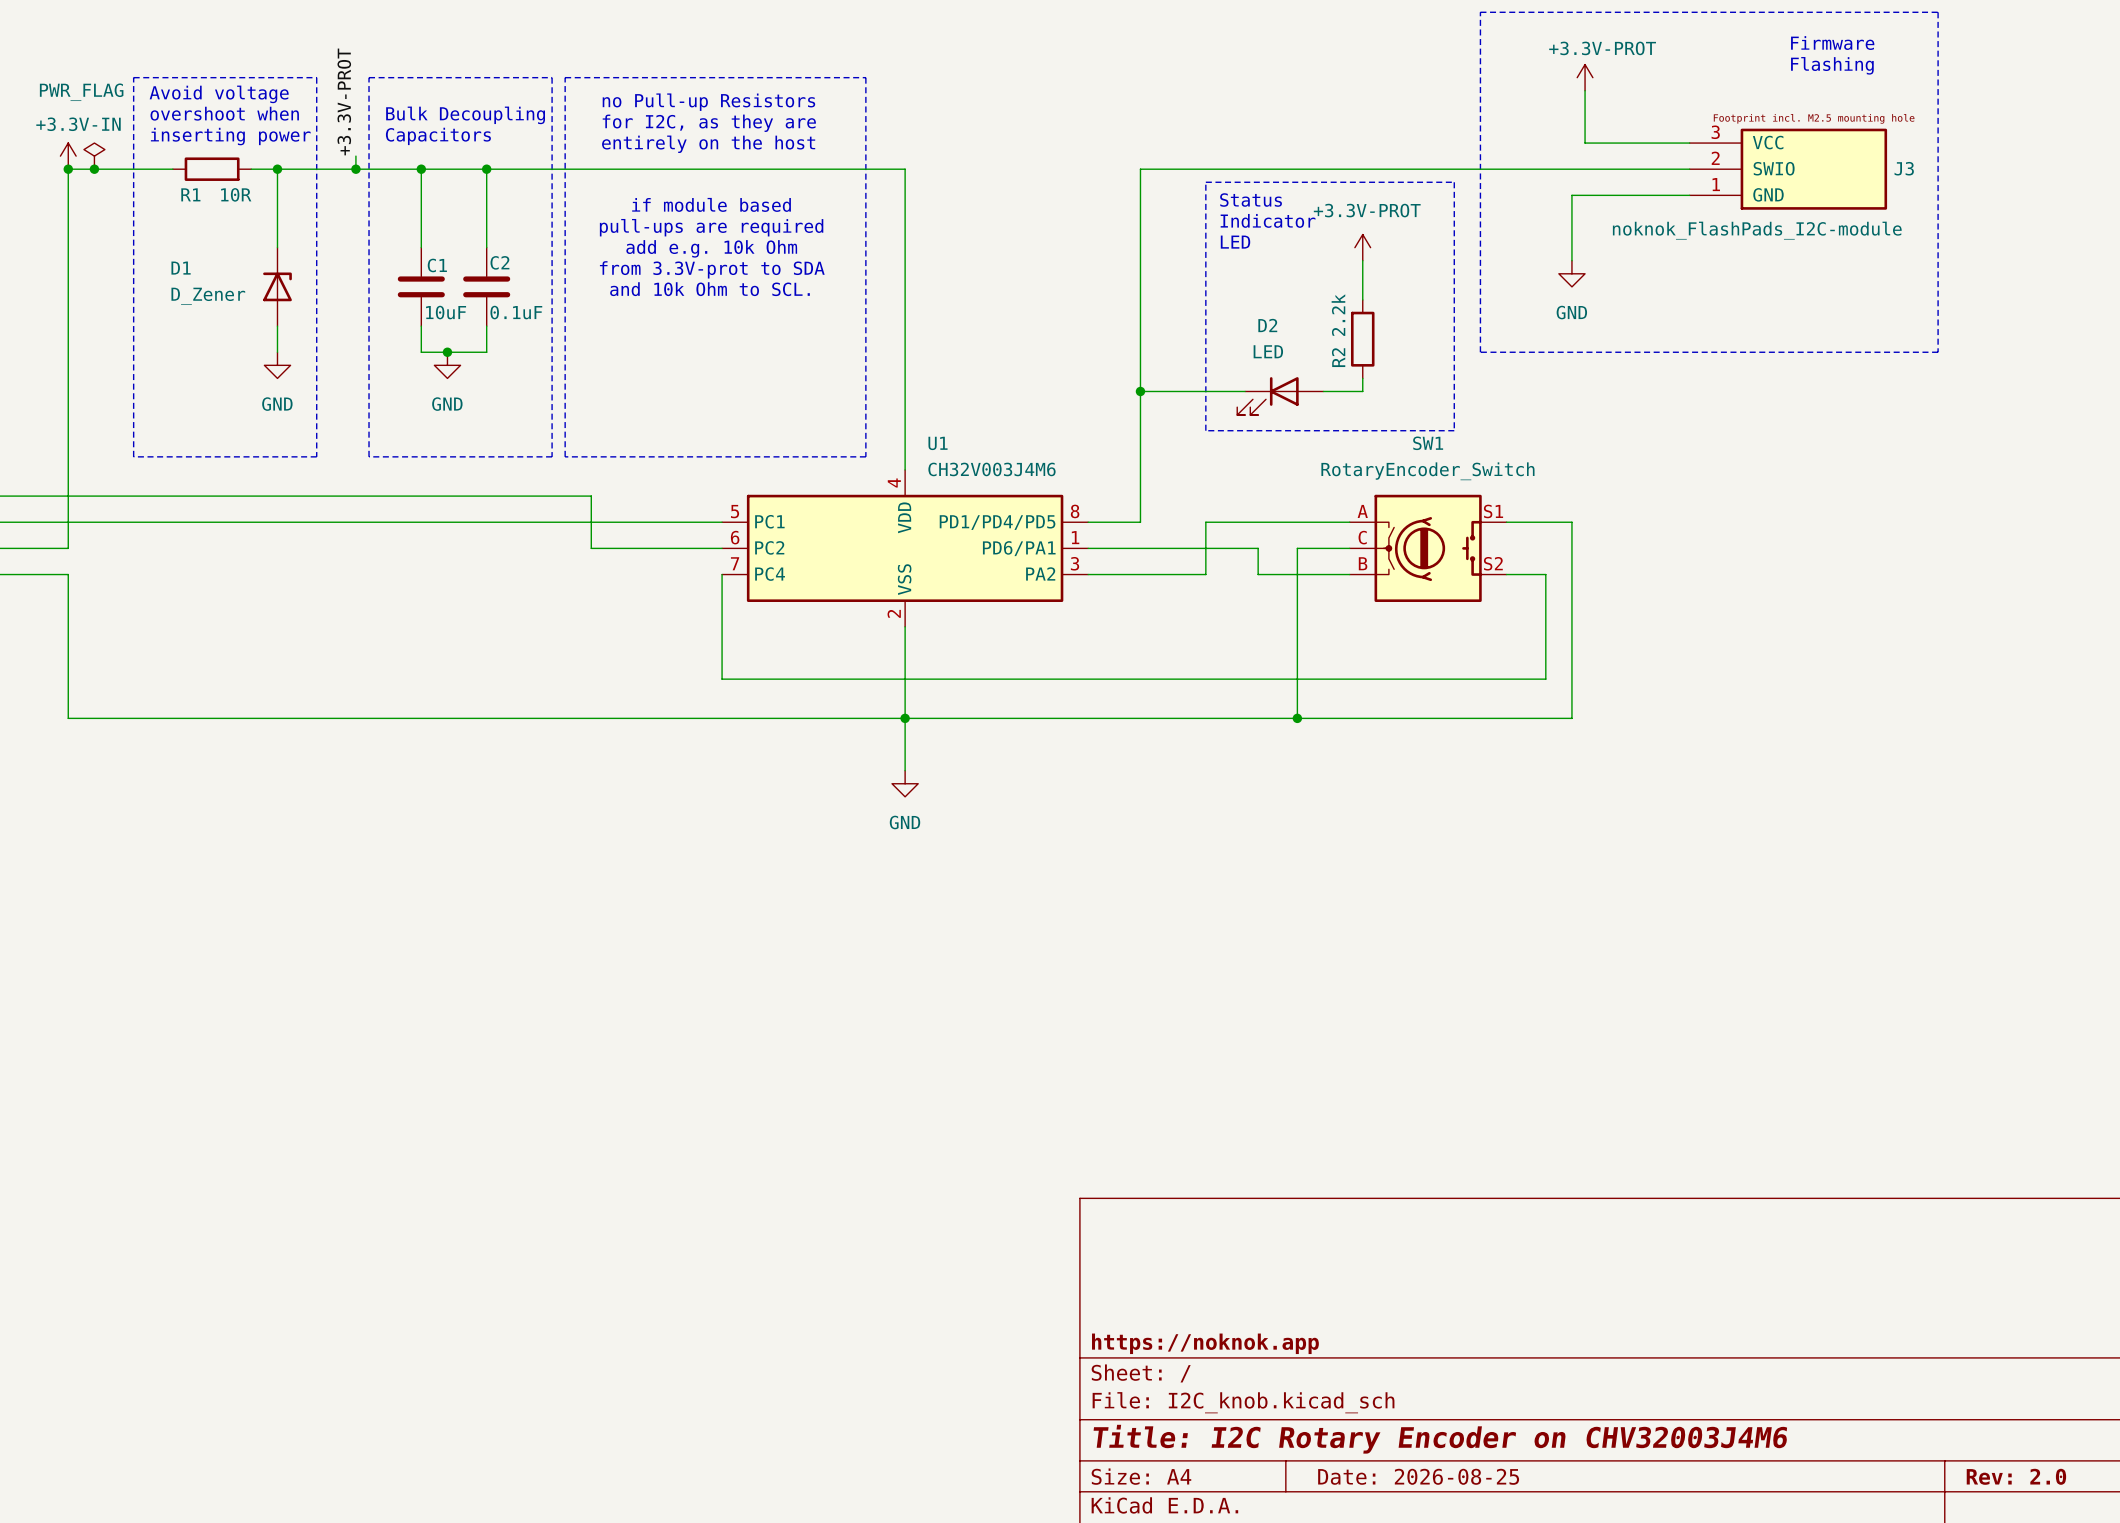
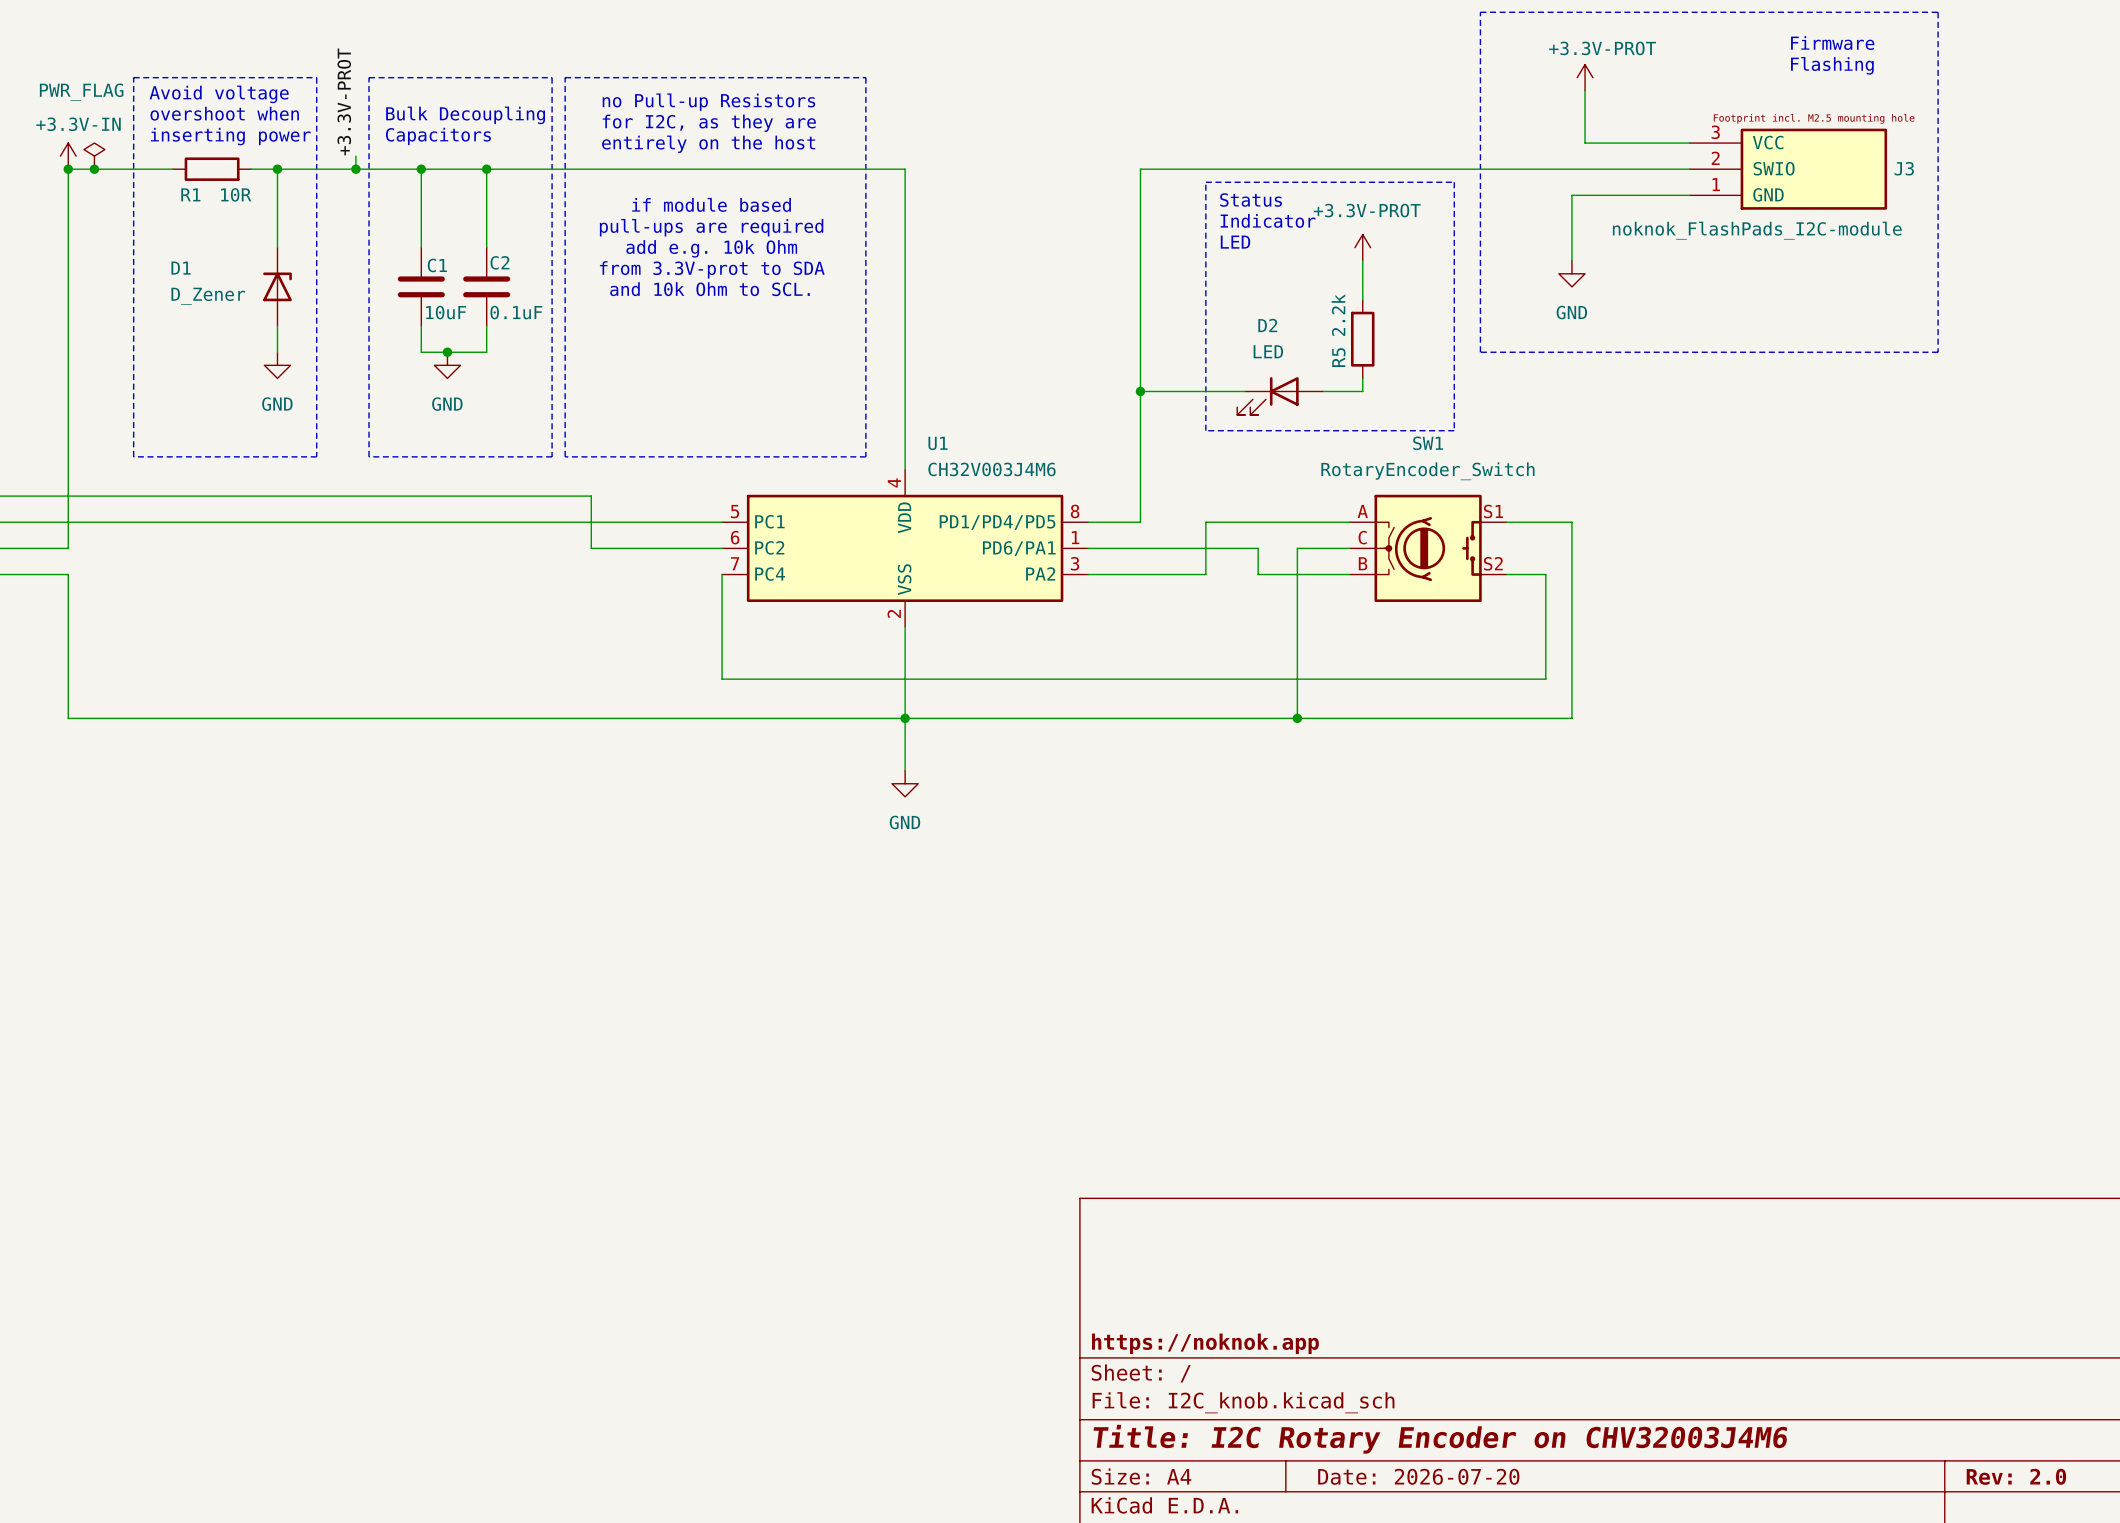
R2 name: R2 (1338, 357) -> R5 (1338, 357)
title block: Date: 2026-08-25 (1418, 1476) -> Date: 2026-07-20 (1418, 1476)

